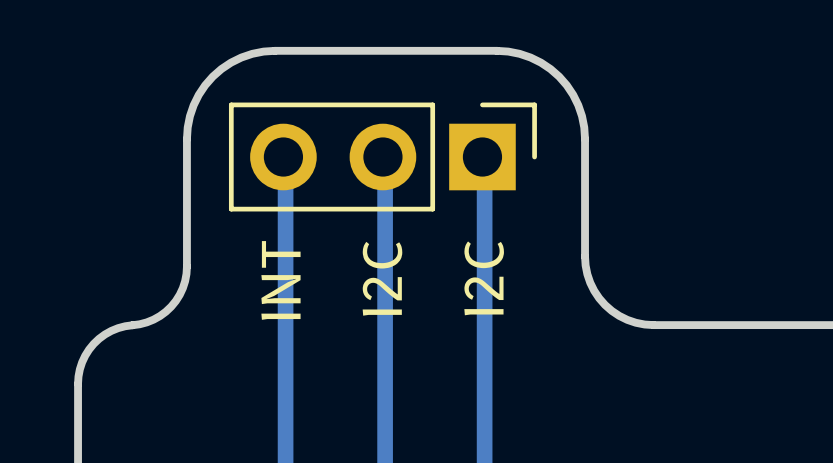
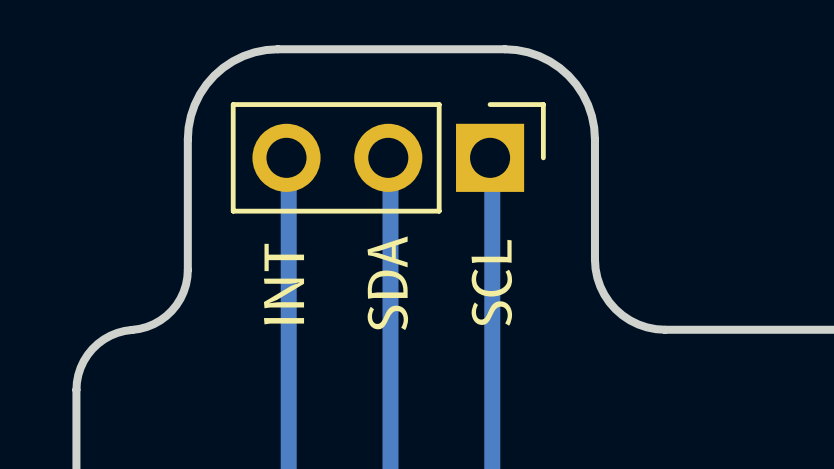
text: I2C (382, 278) -> SDA (387, 283)
text: I2C (484, 278) -> SCL (491, 282)

